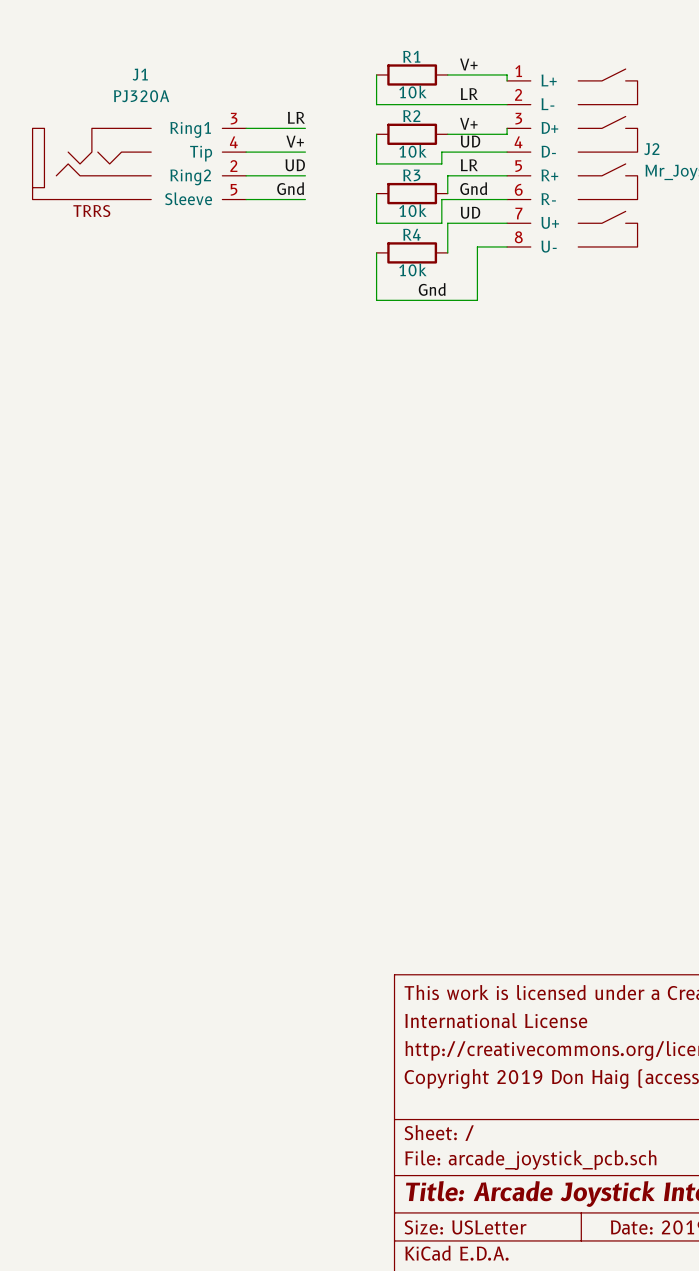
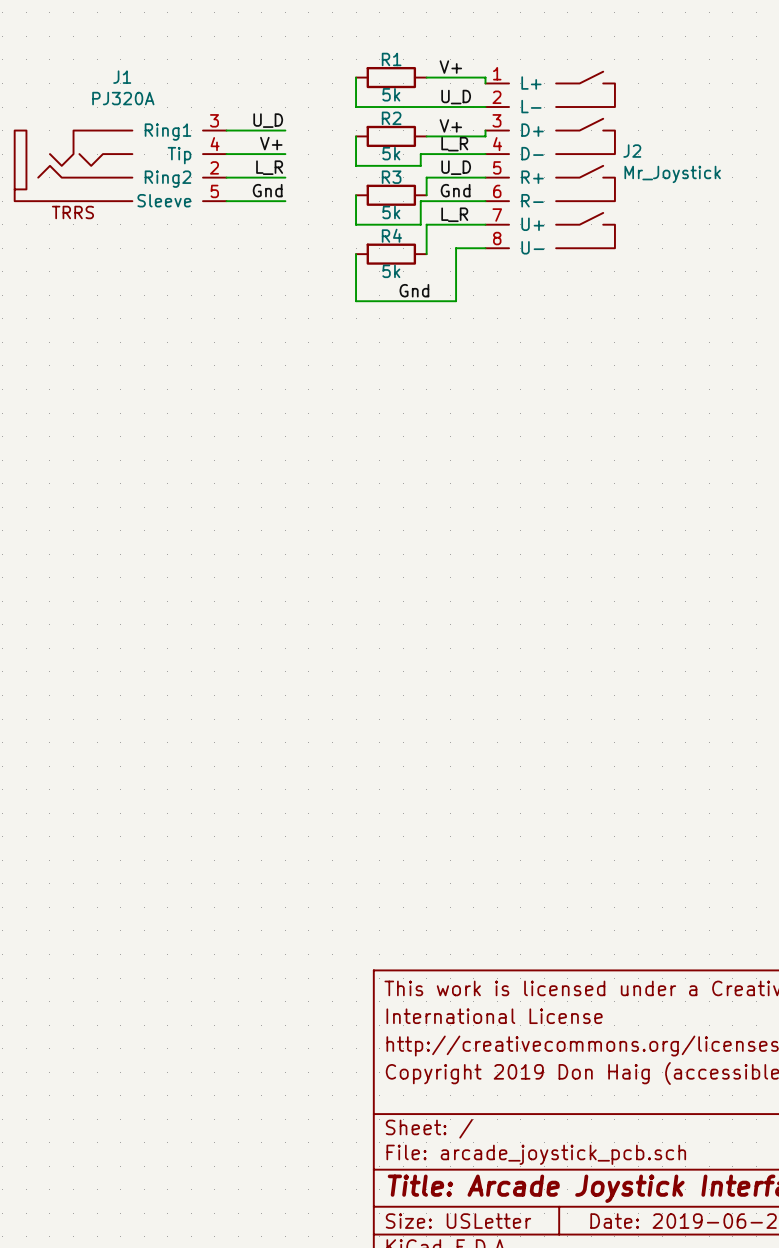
R1 value: 10k (412, 92) -> 5k (391, 94)
label: LR (469, 94) -> U_D (456, 97)
label: LR (296, 117) -> U_D (268, 120)
label: UD (470, 141) -> L_R (454, 144)
R2 value: 10k (412, 151) -> 5k (391, 153)
label: UD (295, 165) -> L_R (269, 167)
label: LR (469, 165) -> U_D (456, 167)
R3 value: 10k (412, 210) -> 5k (391, 212)
label: UD (470, 212) -> L_R (454, 214)
R4 value: 10k (412, 269) -> 5k (391, 271)

